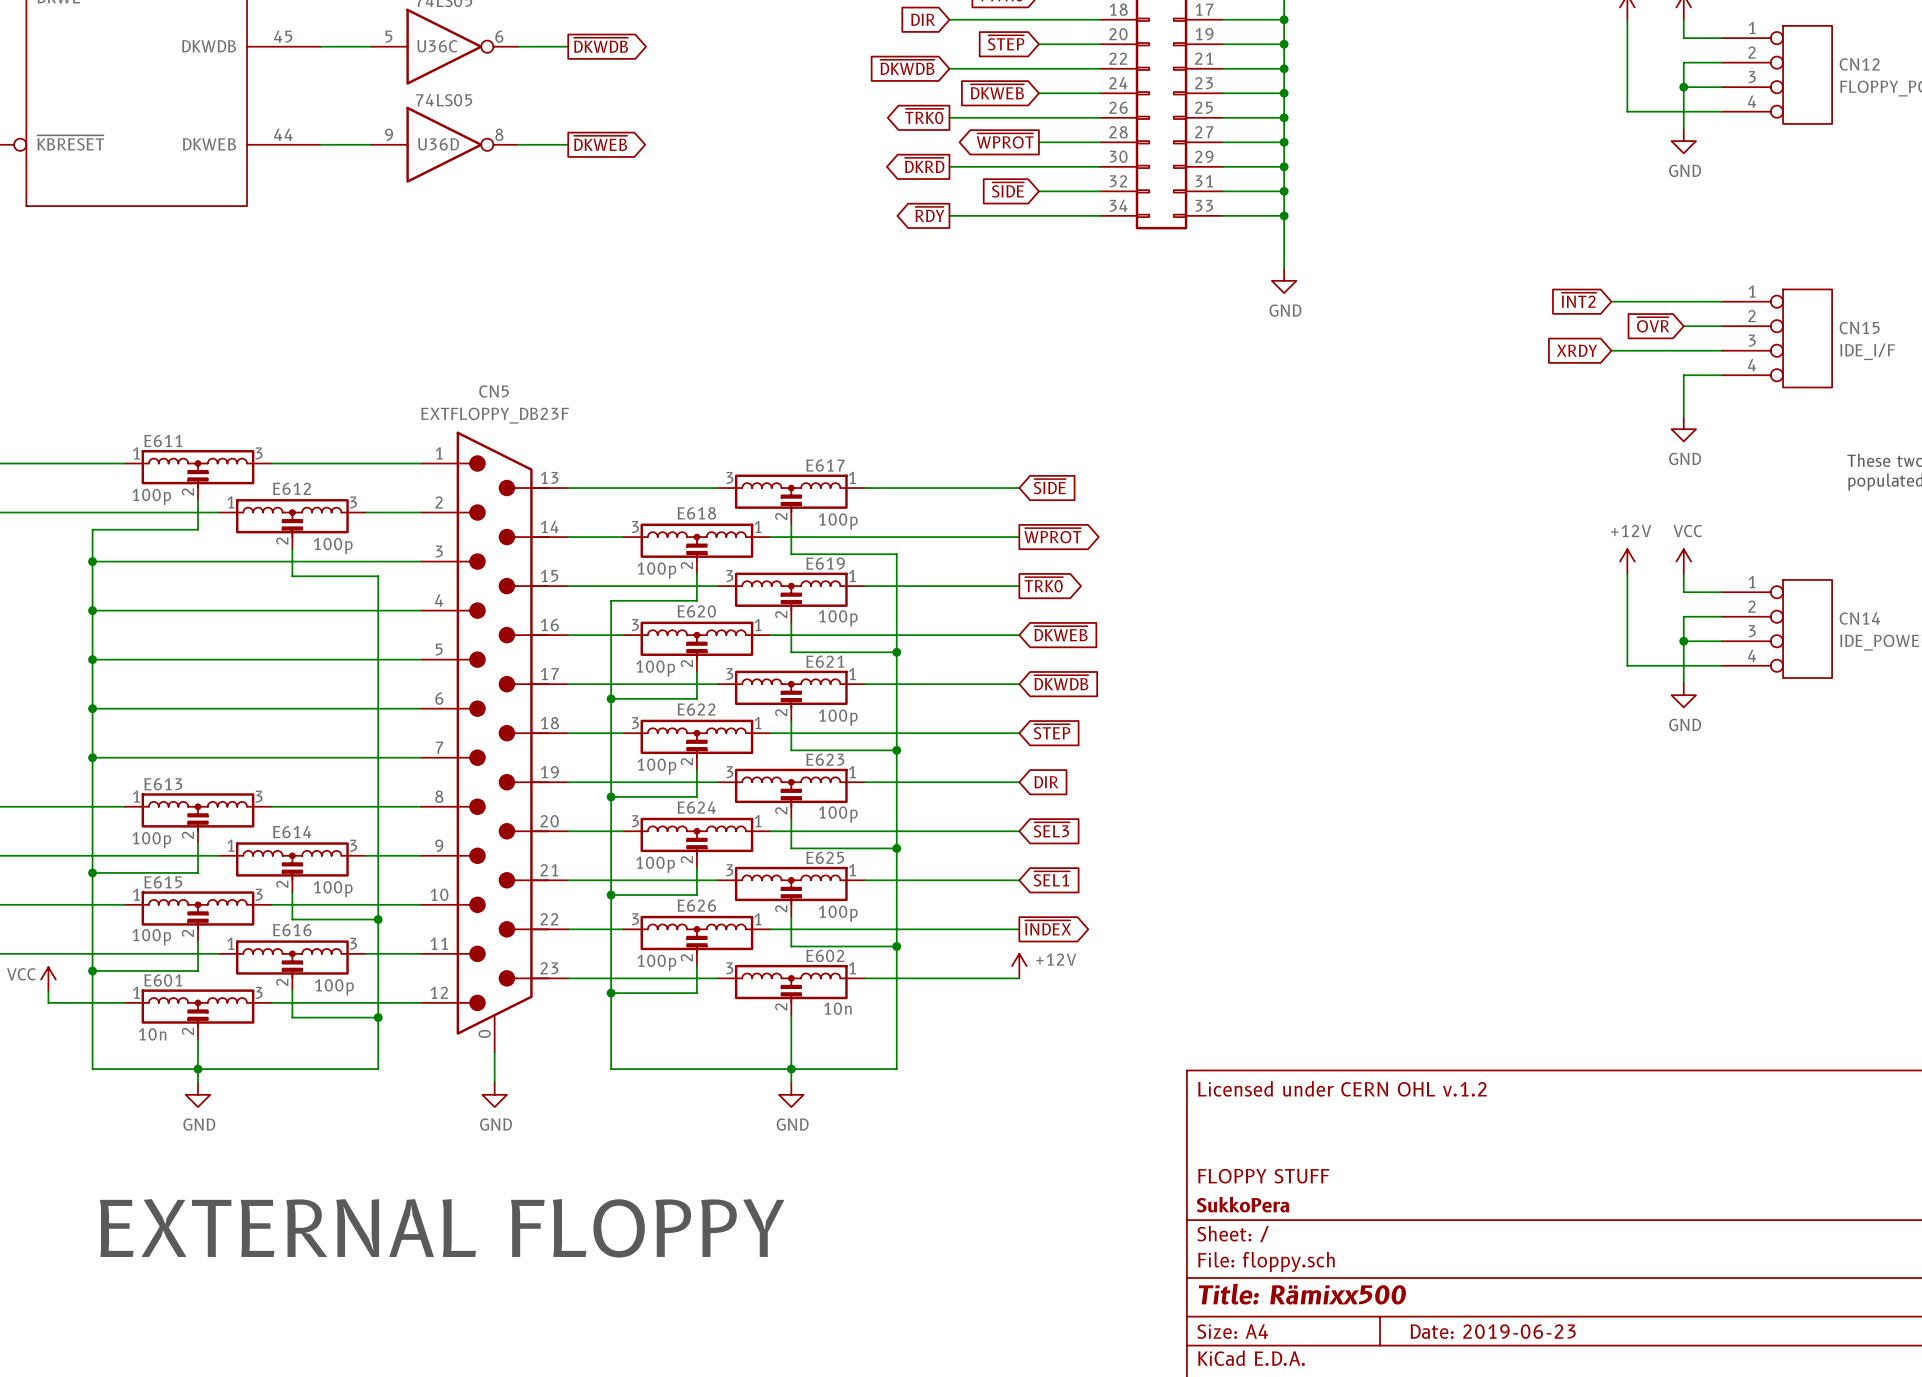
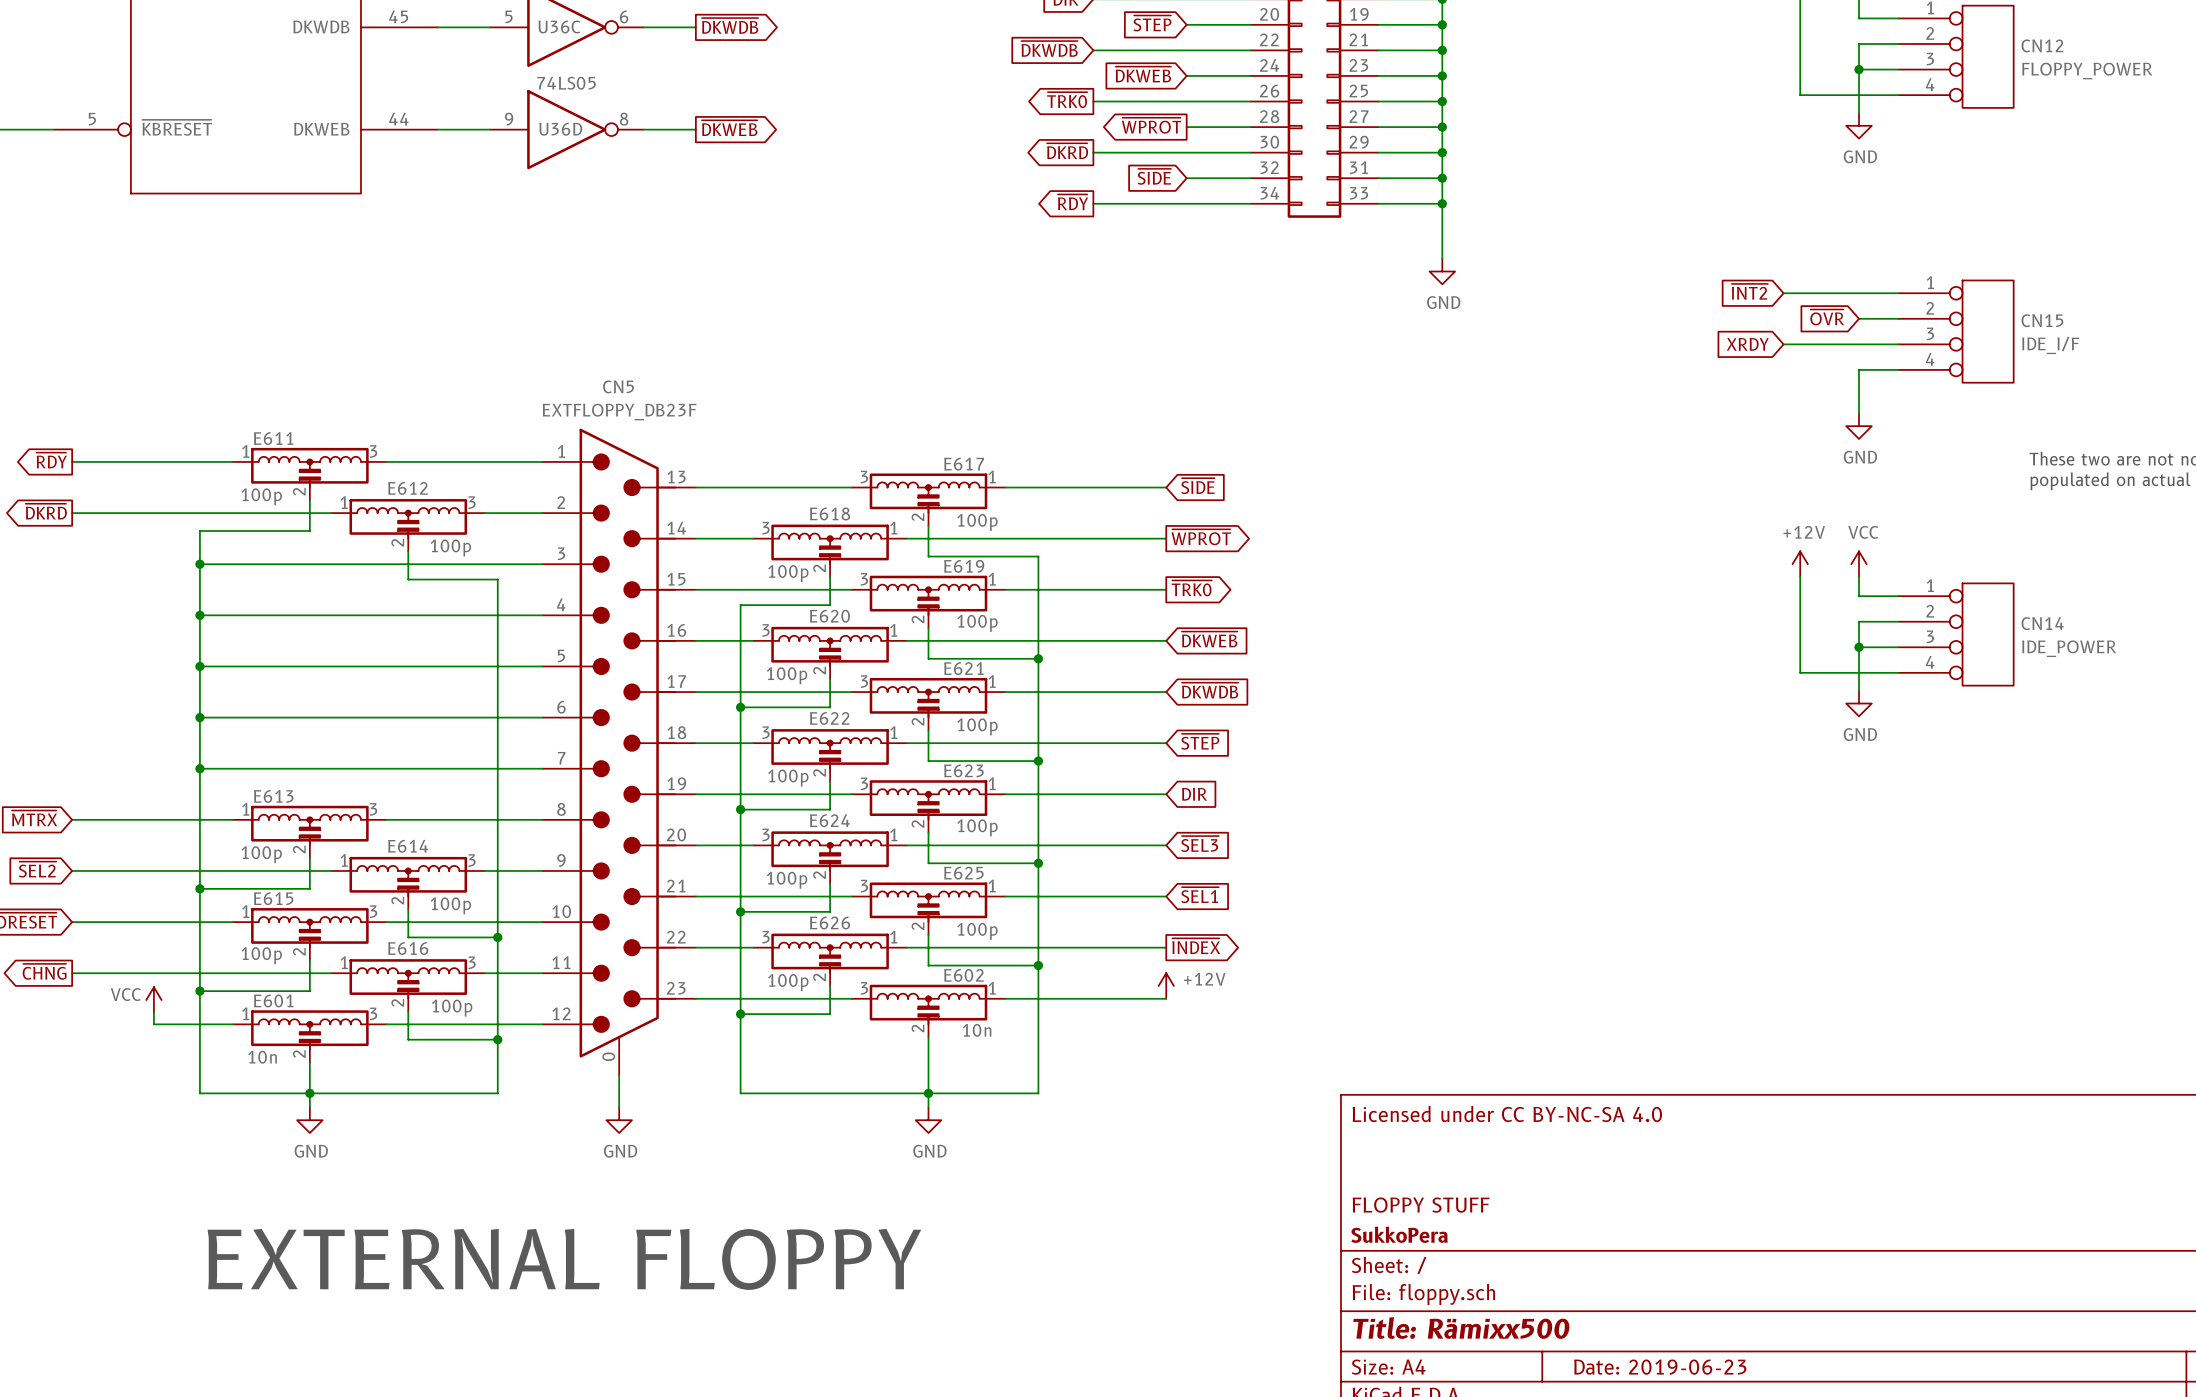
title block: Licensed under CERN OHL v.1.2 (1342, 1088) -> Licensed under CC BY-NC-SA 4.0 (1507, 1113)

